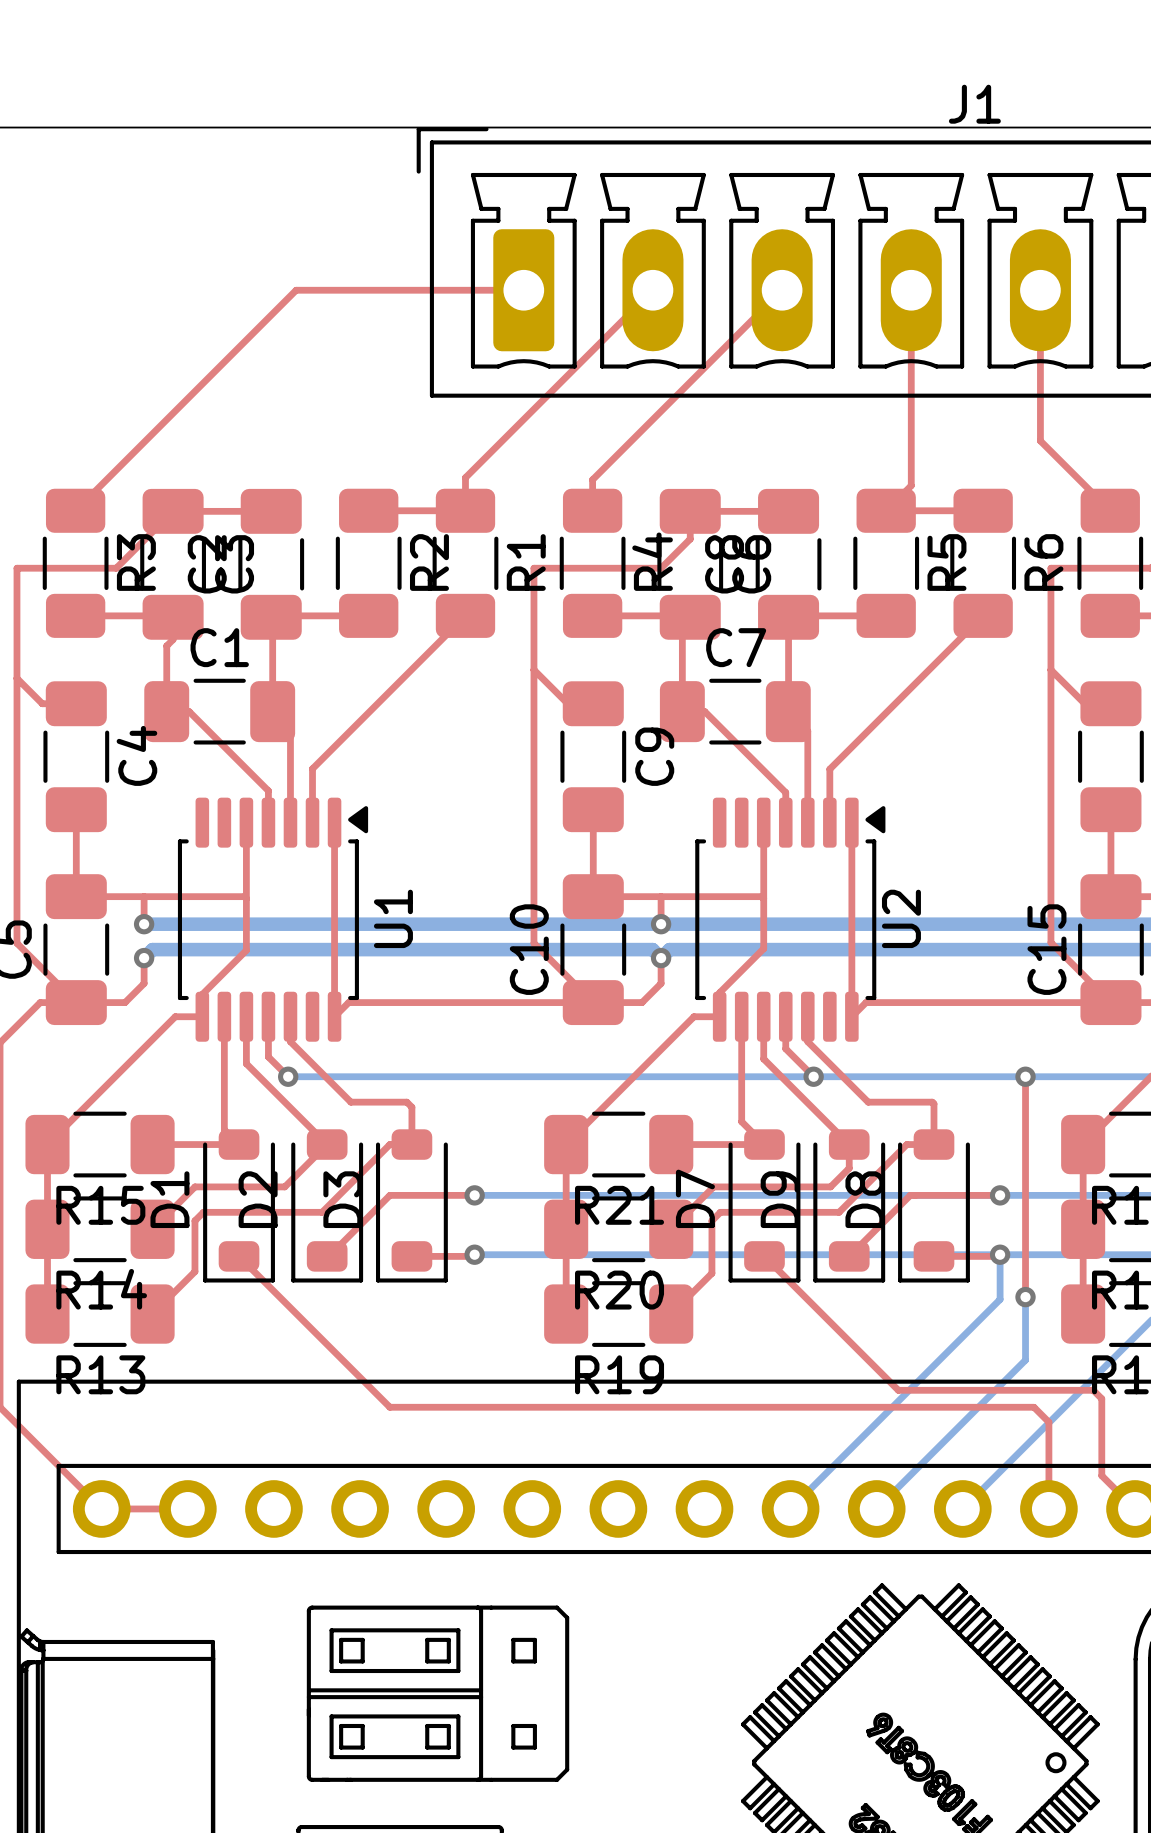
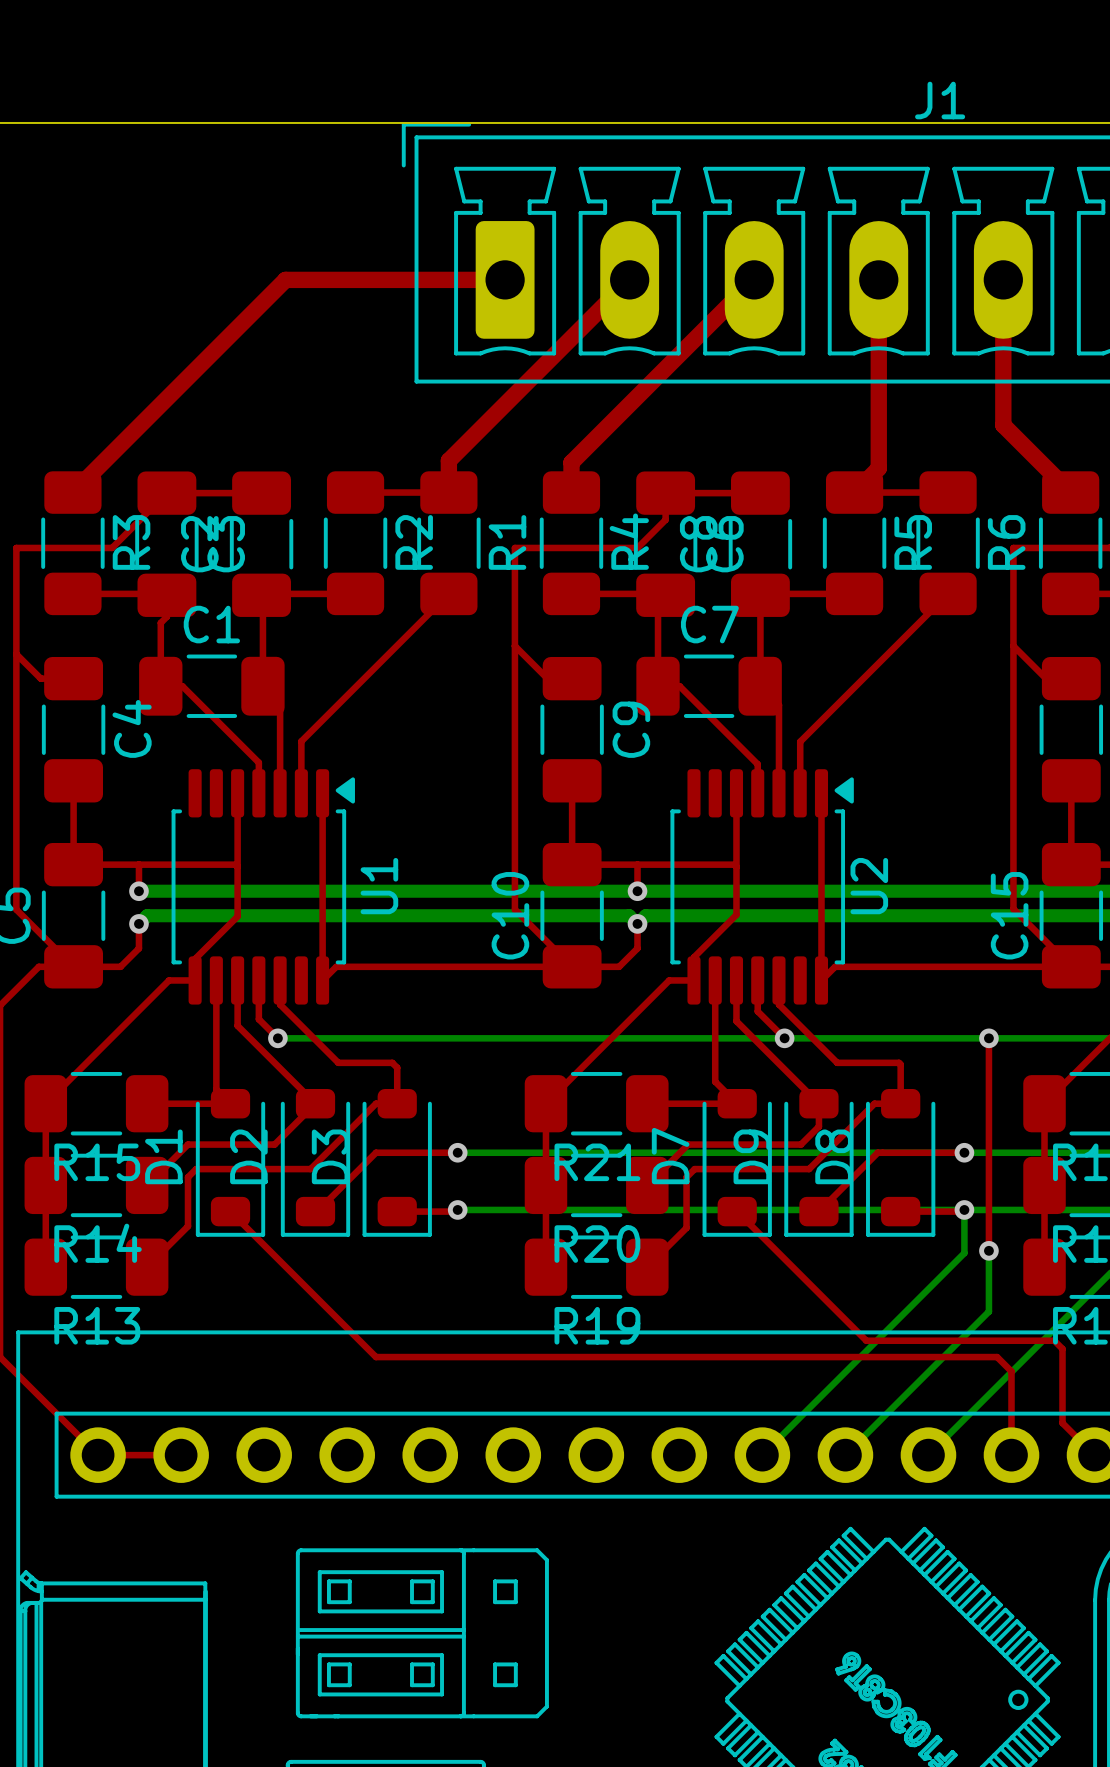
top track width: thin (523, 290) (296, 290) (75, 510) -> thick (505, 279) (285, 279) (72, 492)
top track width: thin (652, 290) (465, 477) (465, 510) -> thick (629, 279) (448, 460) (448, 492)
top track width: thin (782, 290) (592, 479) (592, 510) -> thick (754, 279) (571, 462) (571, 492)
top track width: thin (911, 290) (911, 485) (886, 510) -> thick (878, 279) (878, 468) (854, 492)
top track width: thin (1040, 290) (1040, 440) (1110, 510) -> thick (1003, 279) (1003, 425) (1070, 492)

